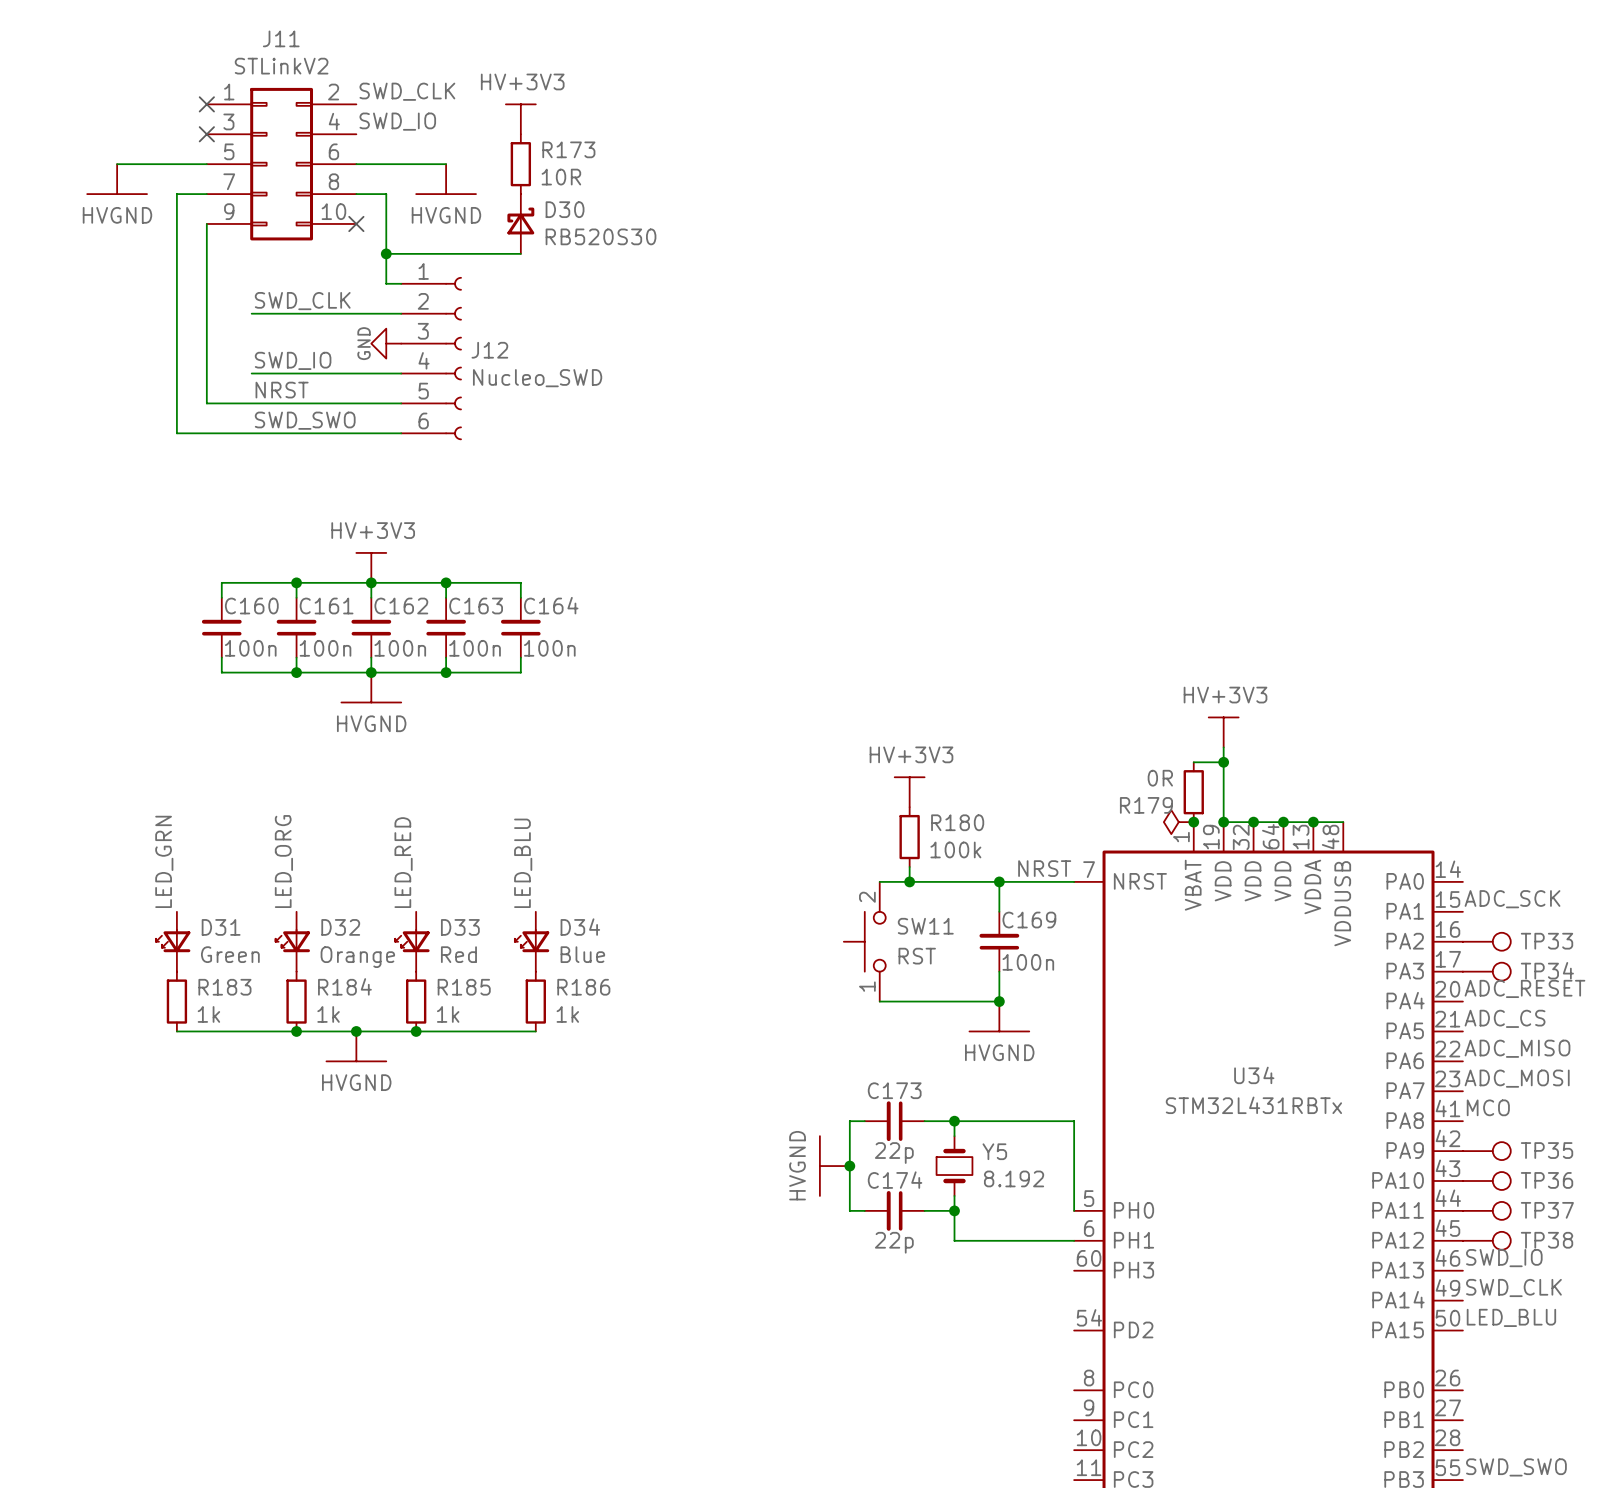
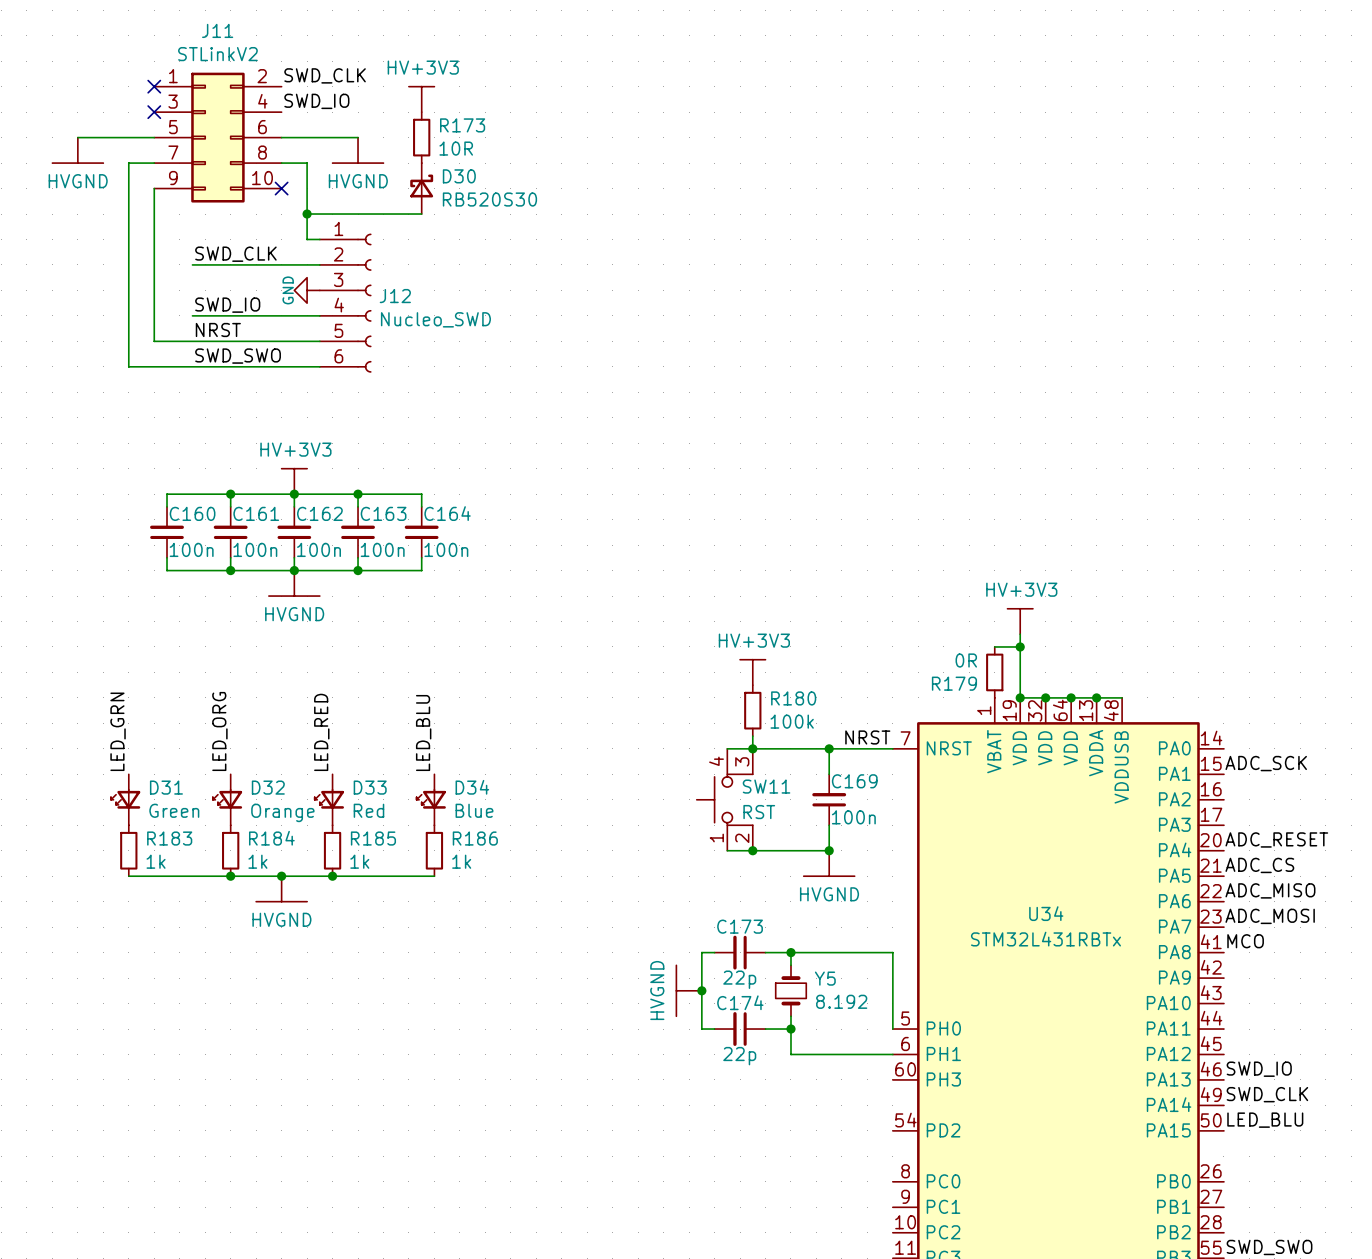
power symbol: (1178, 822) -> none
junction: (1193, 822) -> none
SW11 symbol: [843, 881, 886, 1002] -> [696, 748, 753, 851]
TP33: (1486, 941) -> none
TP34: (1486, 971) -> none
junction: none -> (752, 850)
TP35: (1486, 1151) -> none
TP36: (1486, 1181) -> none
TP37: (1486, 1210) -> none
TP38: (1486, 1240) -> none

